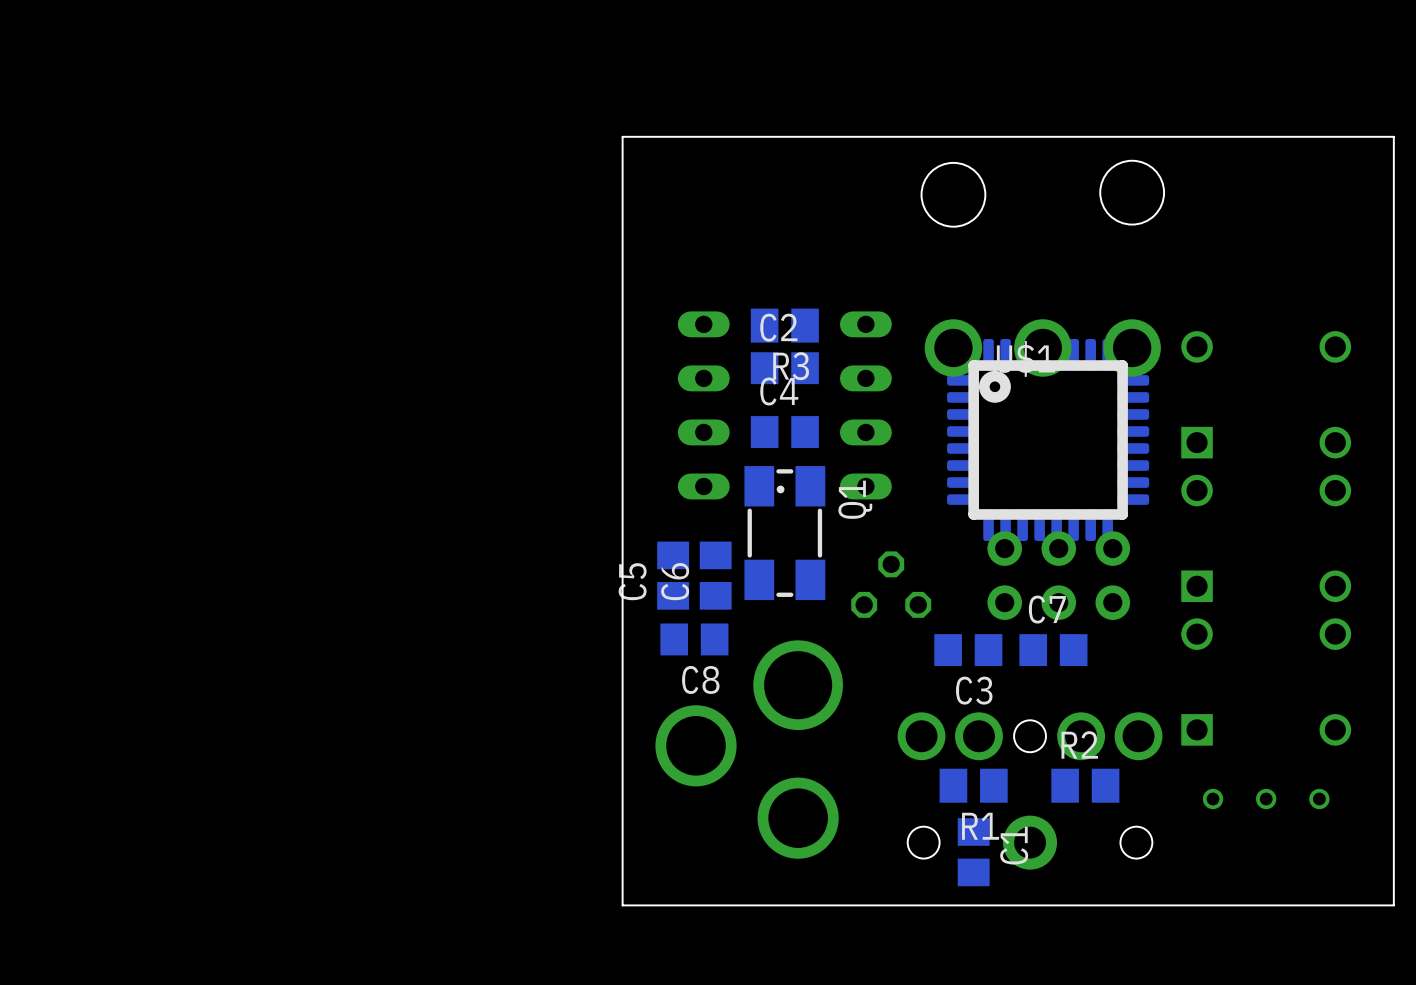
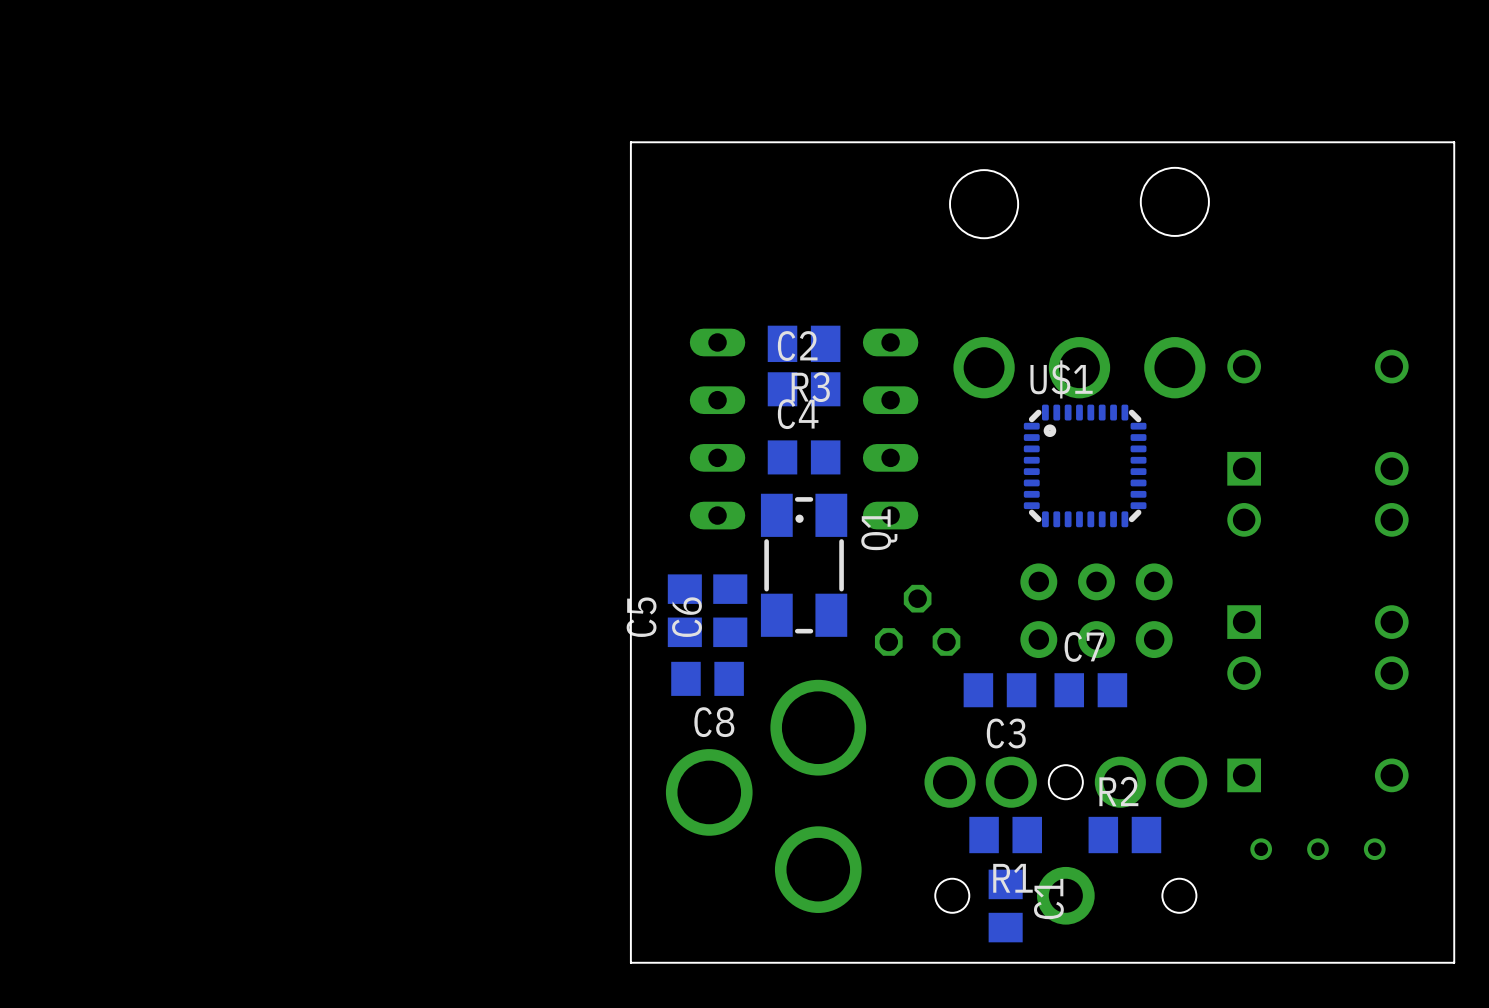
U$1 footprint: [947, 338, 1150, 542] -> [1023, 404, 1147, 528]

